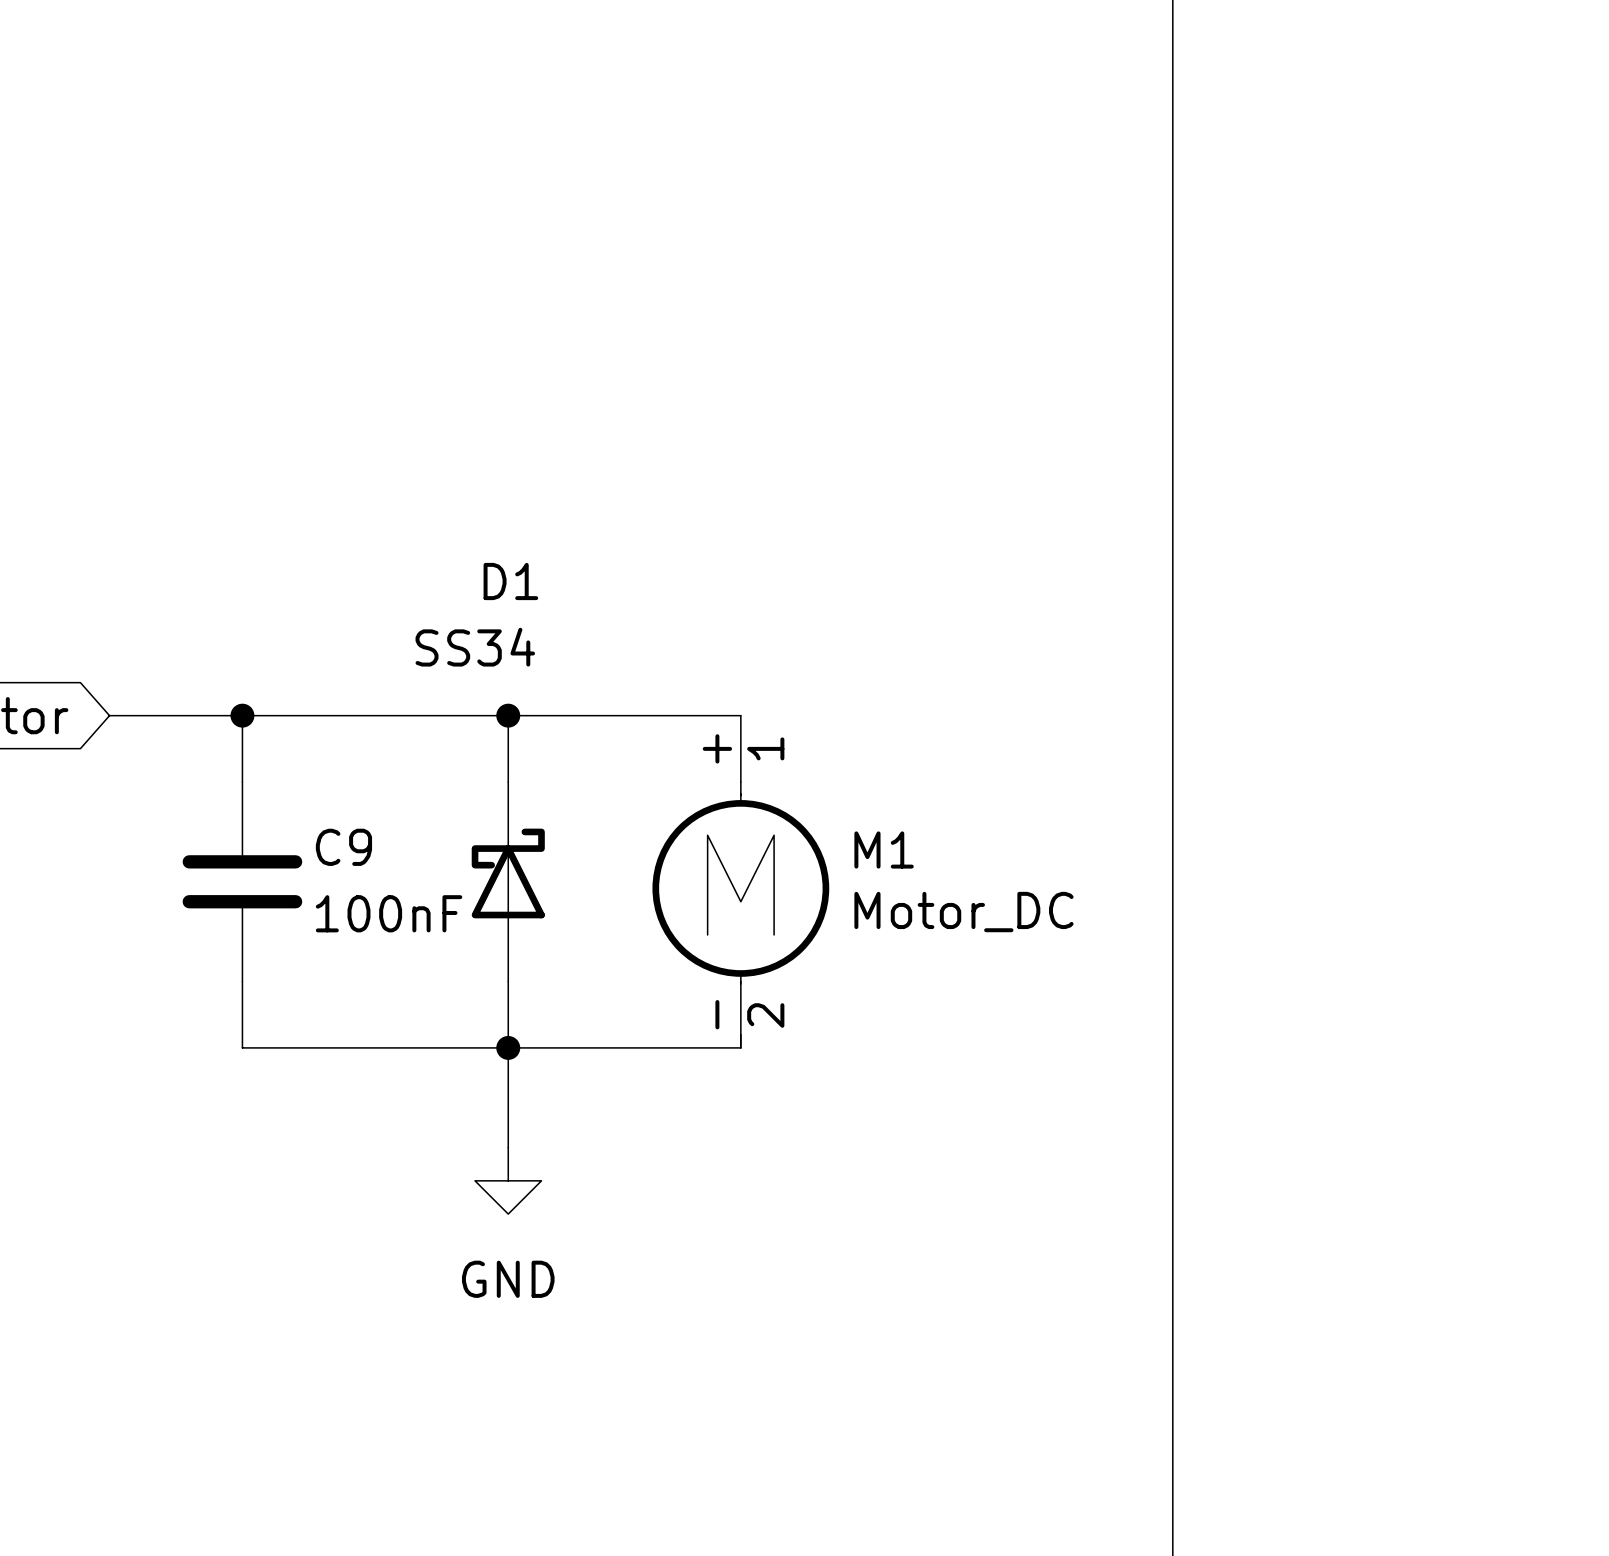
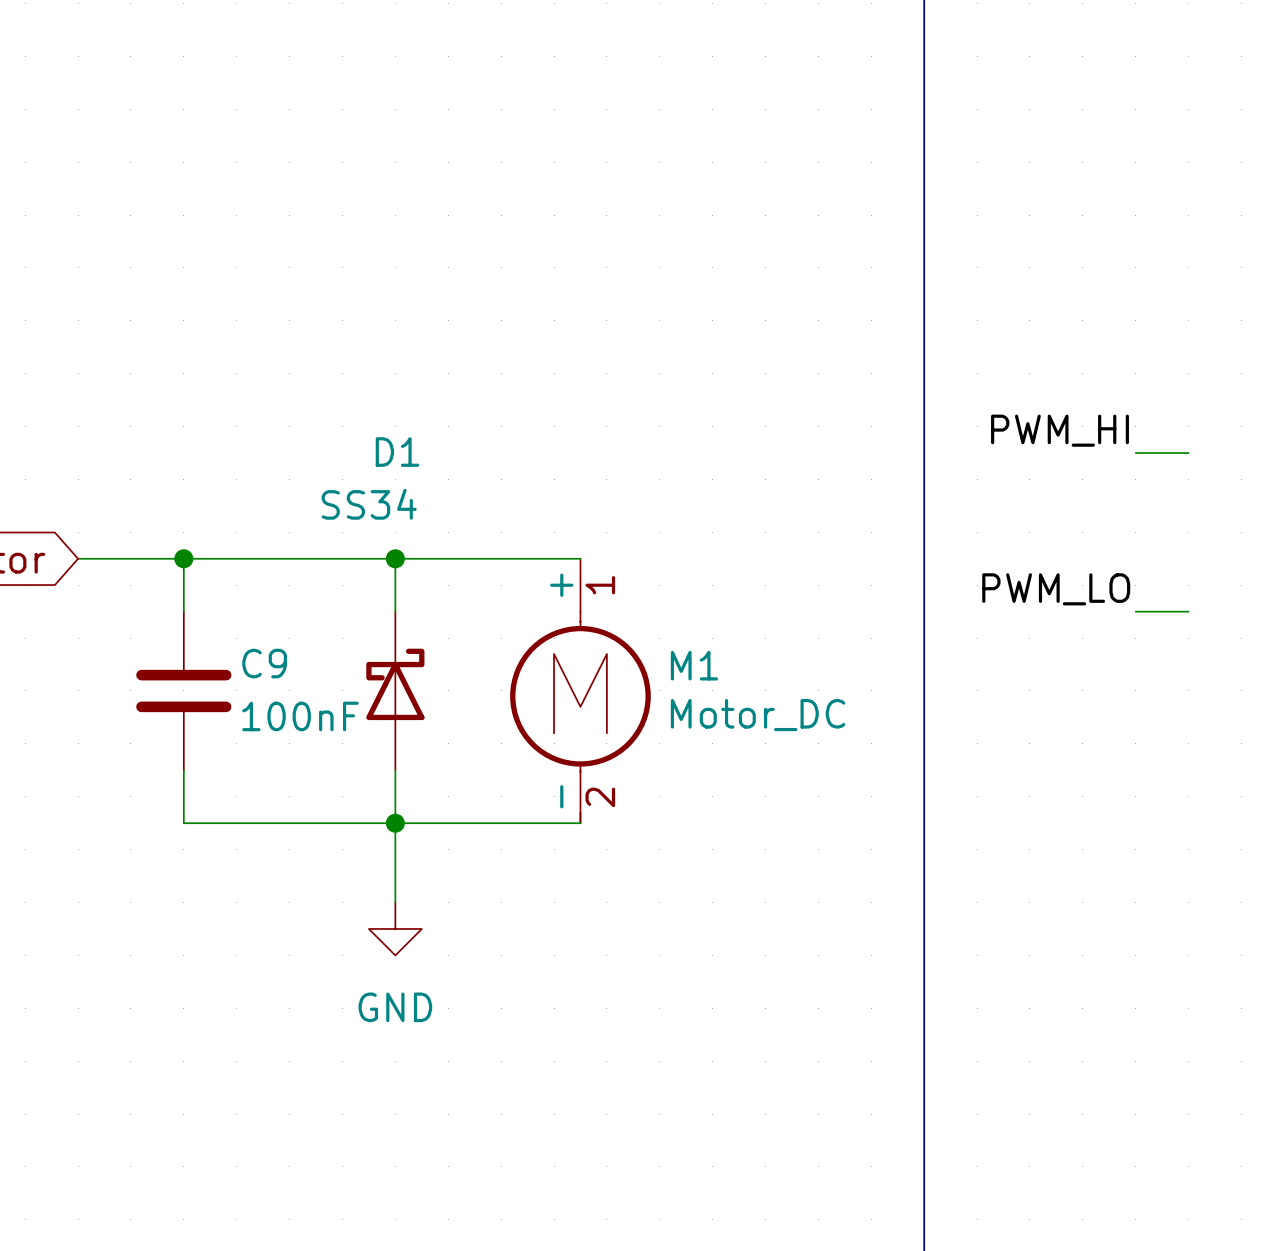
label: none -> PWM_HI (1060, 430)
wire: none -> (1135, 453) (1188, 453)
label: none -> PWM_LO (1056, 589)
wire: none -> (1135, 611) (1188, 611)

